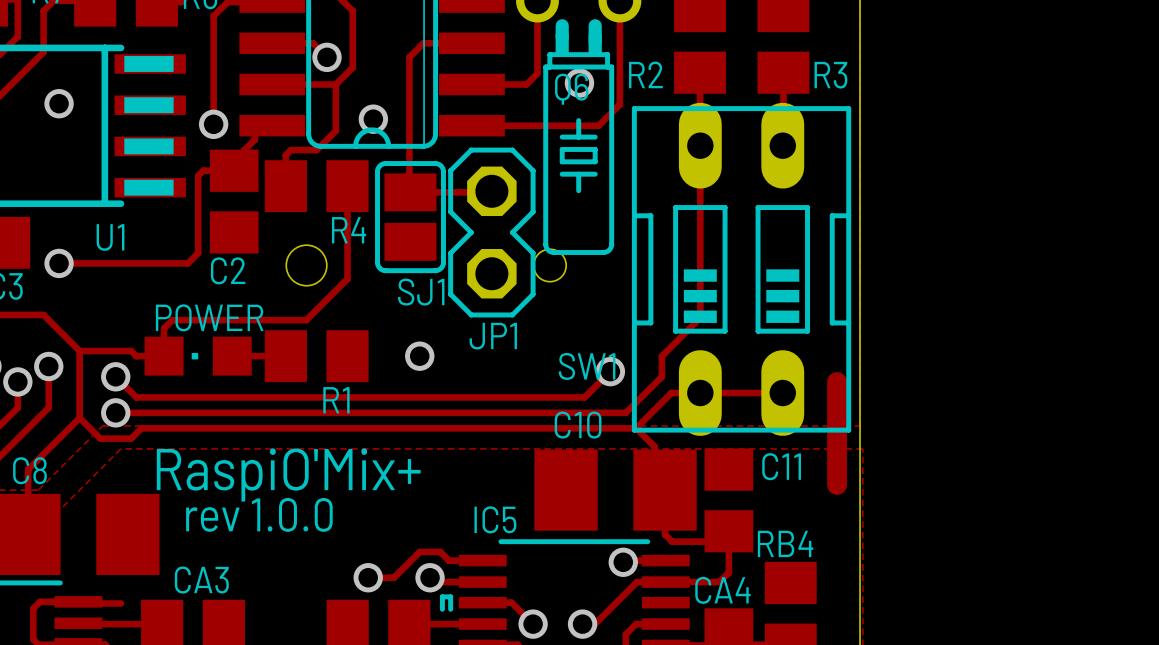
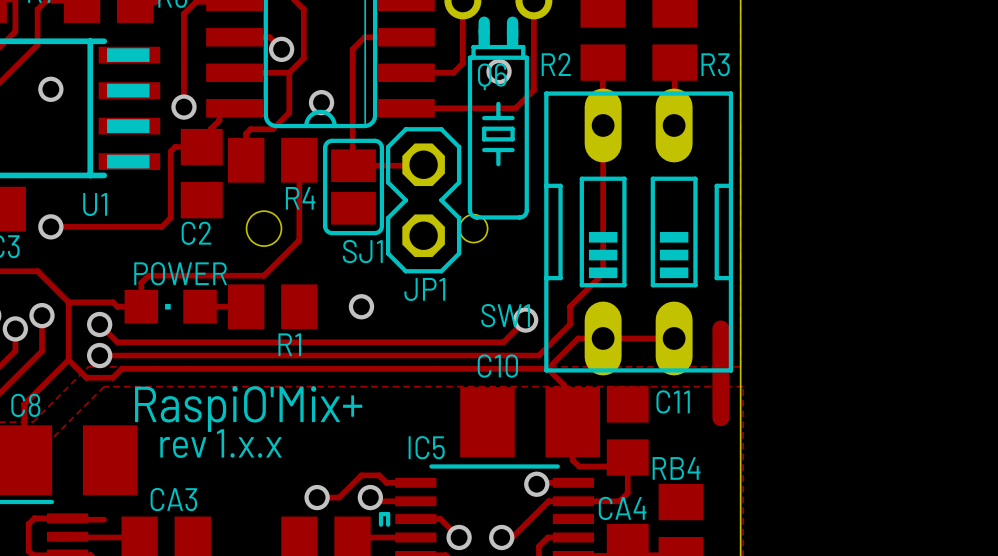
text: rev 1.0.0 (259, 514) -> rev 1.x.x (221, 443)

